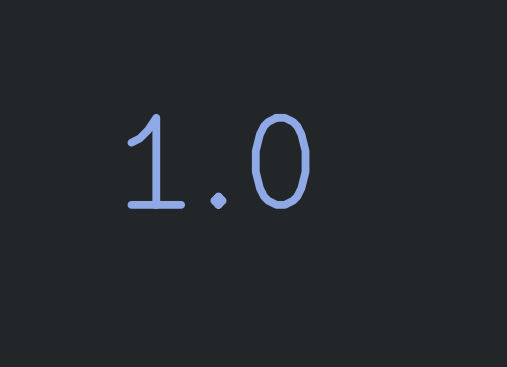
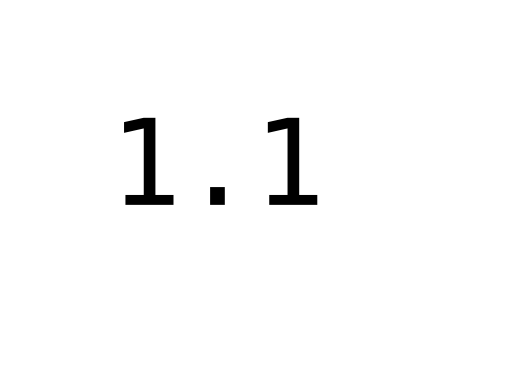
text: 1.0 (218, 161) -> 1.1 (220, 161)

